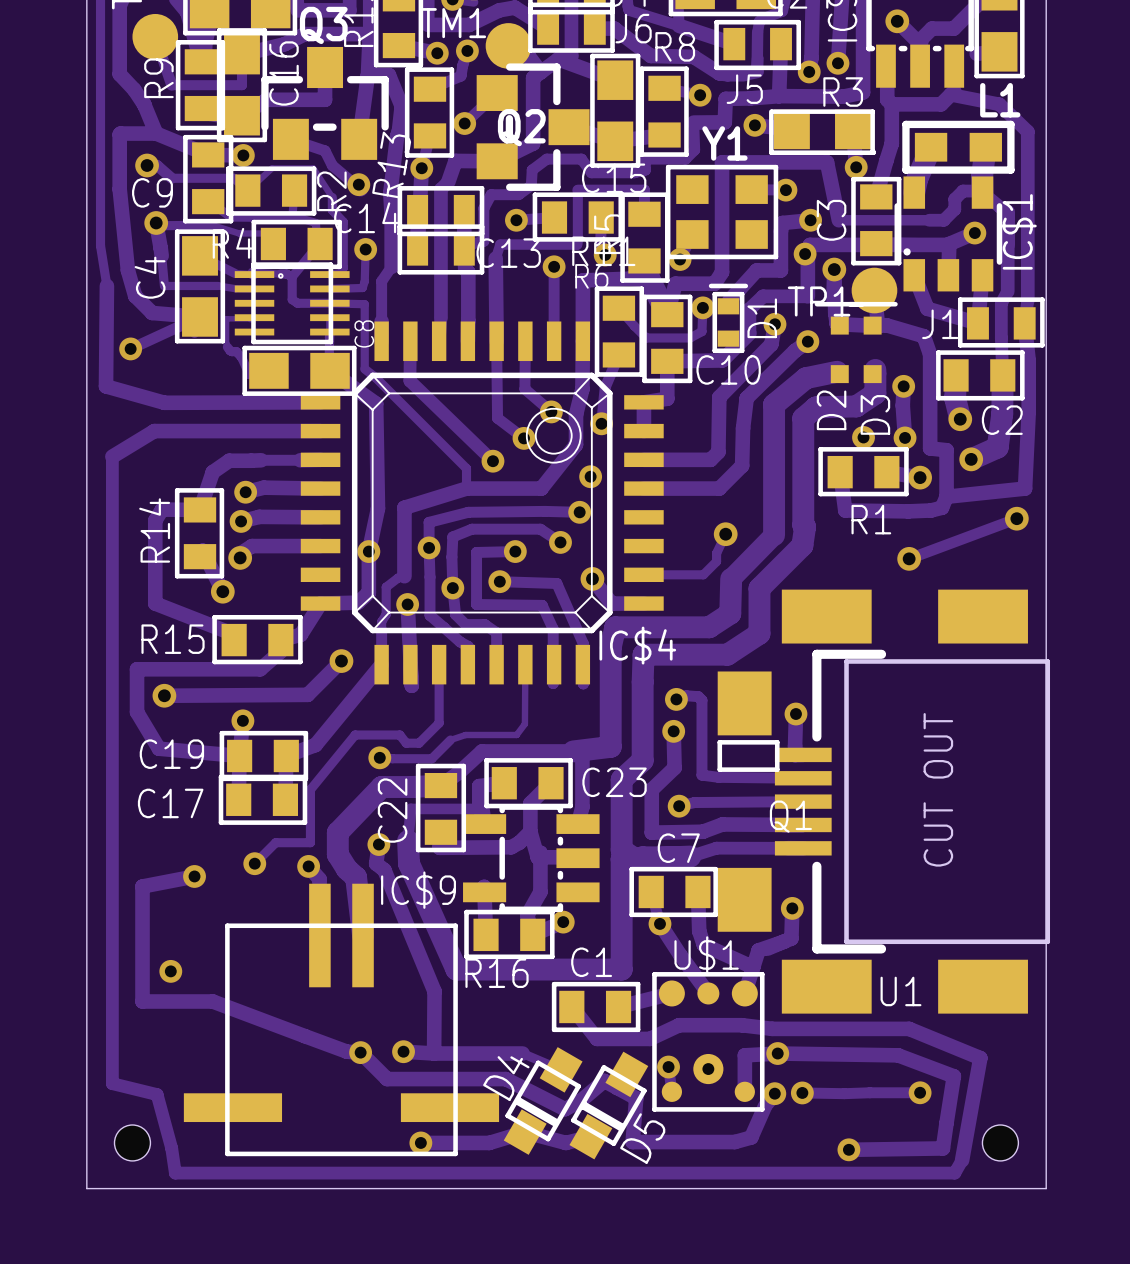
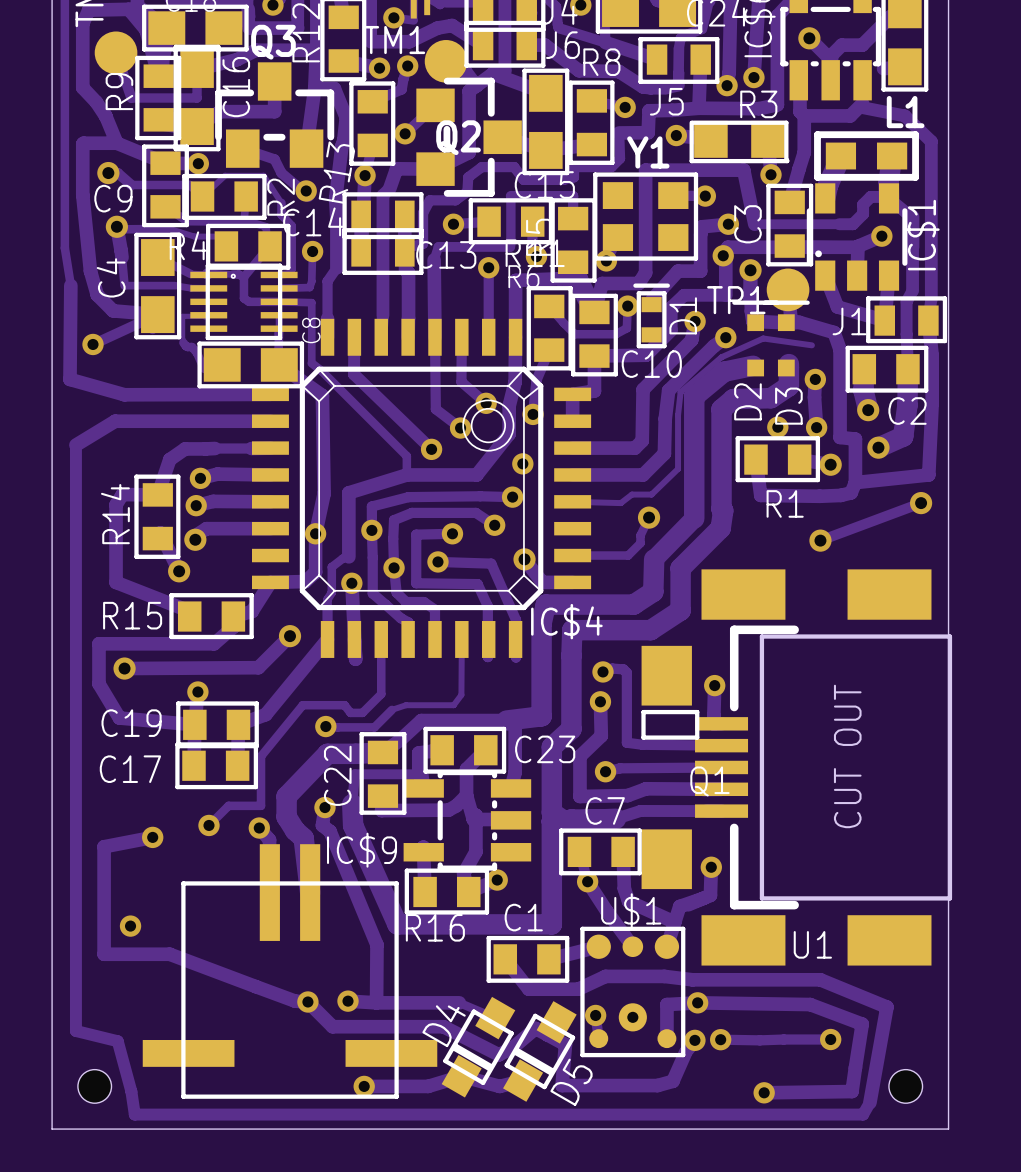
track: none -> (811, 345) (763, 338) (721, 357) (680, 392) (678, 415) (678, 468) (651, 494) (631, 494) (620, 503) (572, 501)

